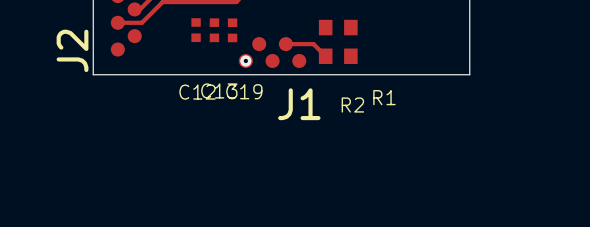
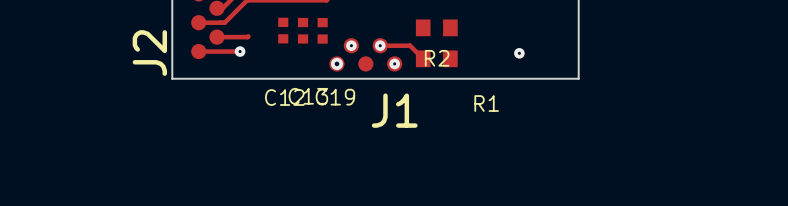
track: none -> (248, 36) (216, 37)
via: none -> (351, 45)
via: none -> (380, 45)
track: none -> (198, 51) (240, 51)
via: none -> (240, 51)
via: none -> (519, 53)
via: none -> (394, 63)
R2 name position: R2 (352, 105) -> R2 (437, 58)

